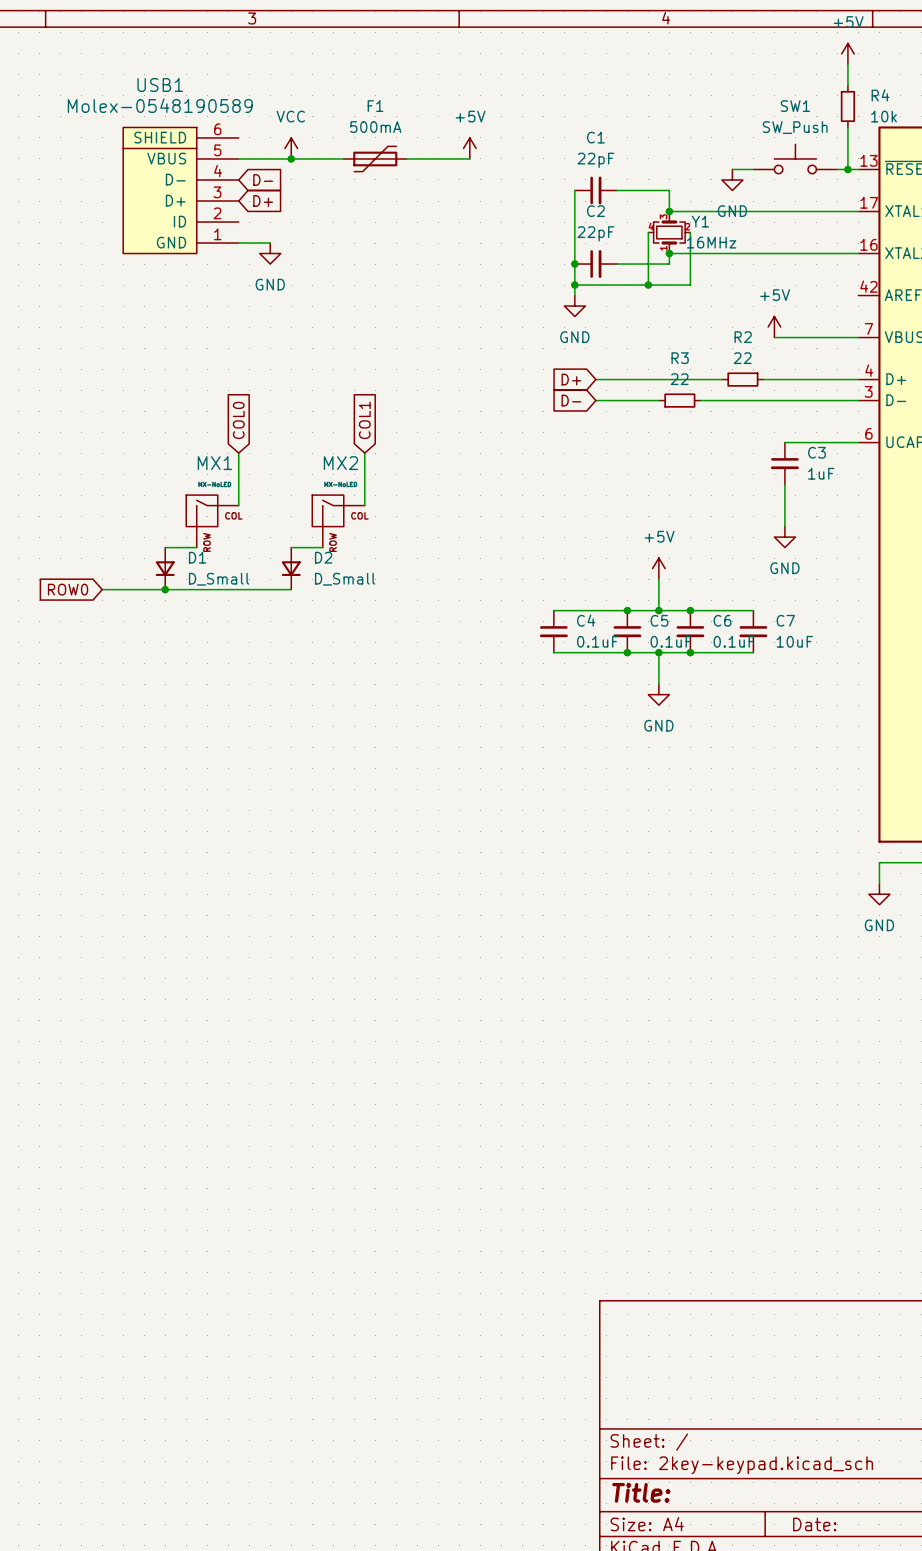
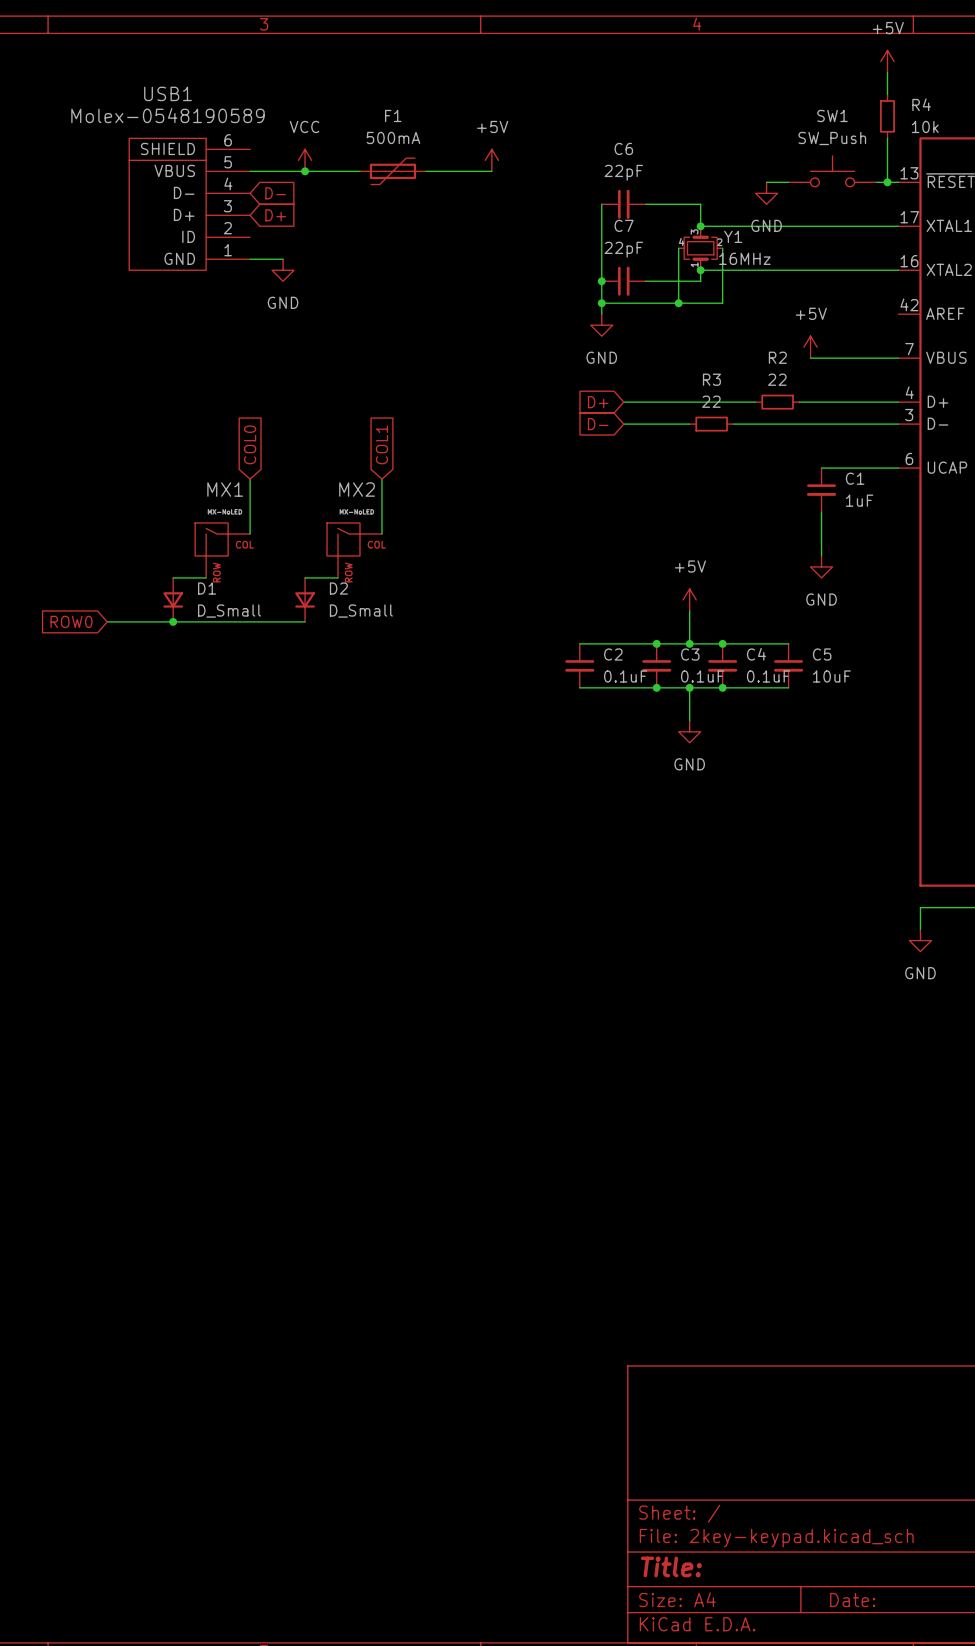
C1 name: C1 (595, 137) -> C6 (623, 148)
C2 name: C2 (595, 211) -> C7 (624, 225)
C3 name: C3 (817, 452) -> C1 (855, 478)
C4 name: C4 (586, 620) -> C2 (613, 654)
C5 name: C5 (659, 620) -> C3 (690, 654)
C6 name: C6 (722, 620) -> C4 (756, 654)
C7 name: C7 (785, 620) -> C5 (822, 654)

